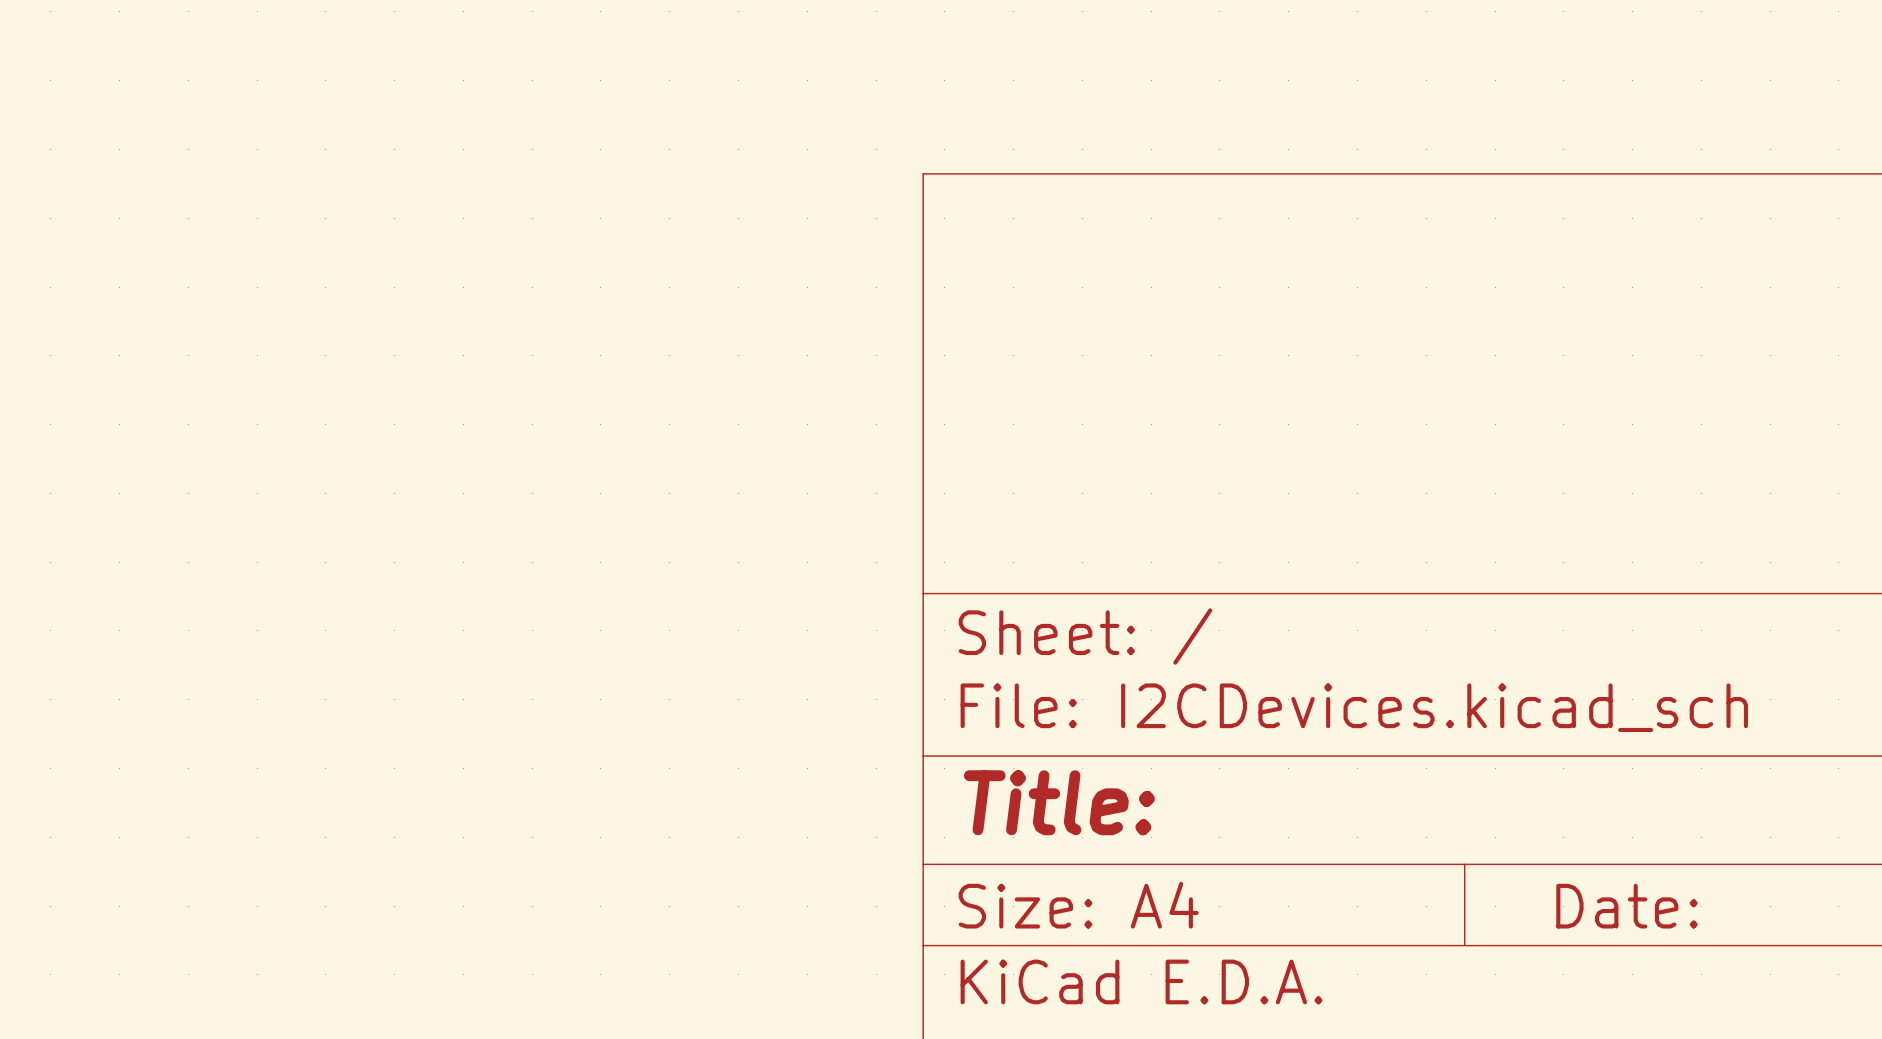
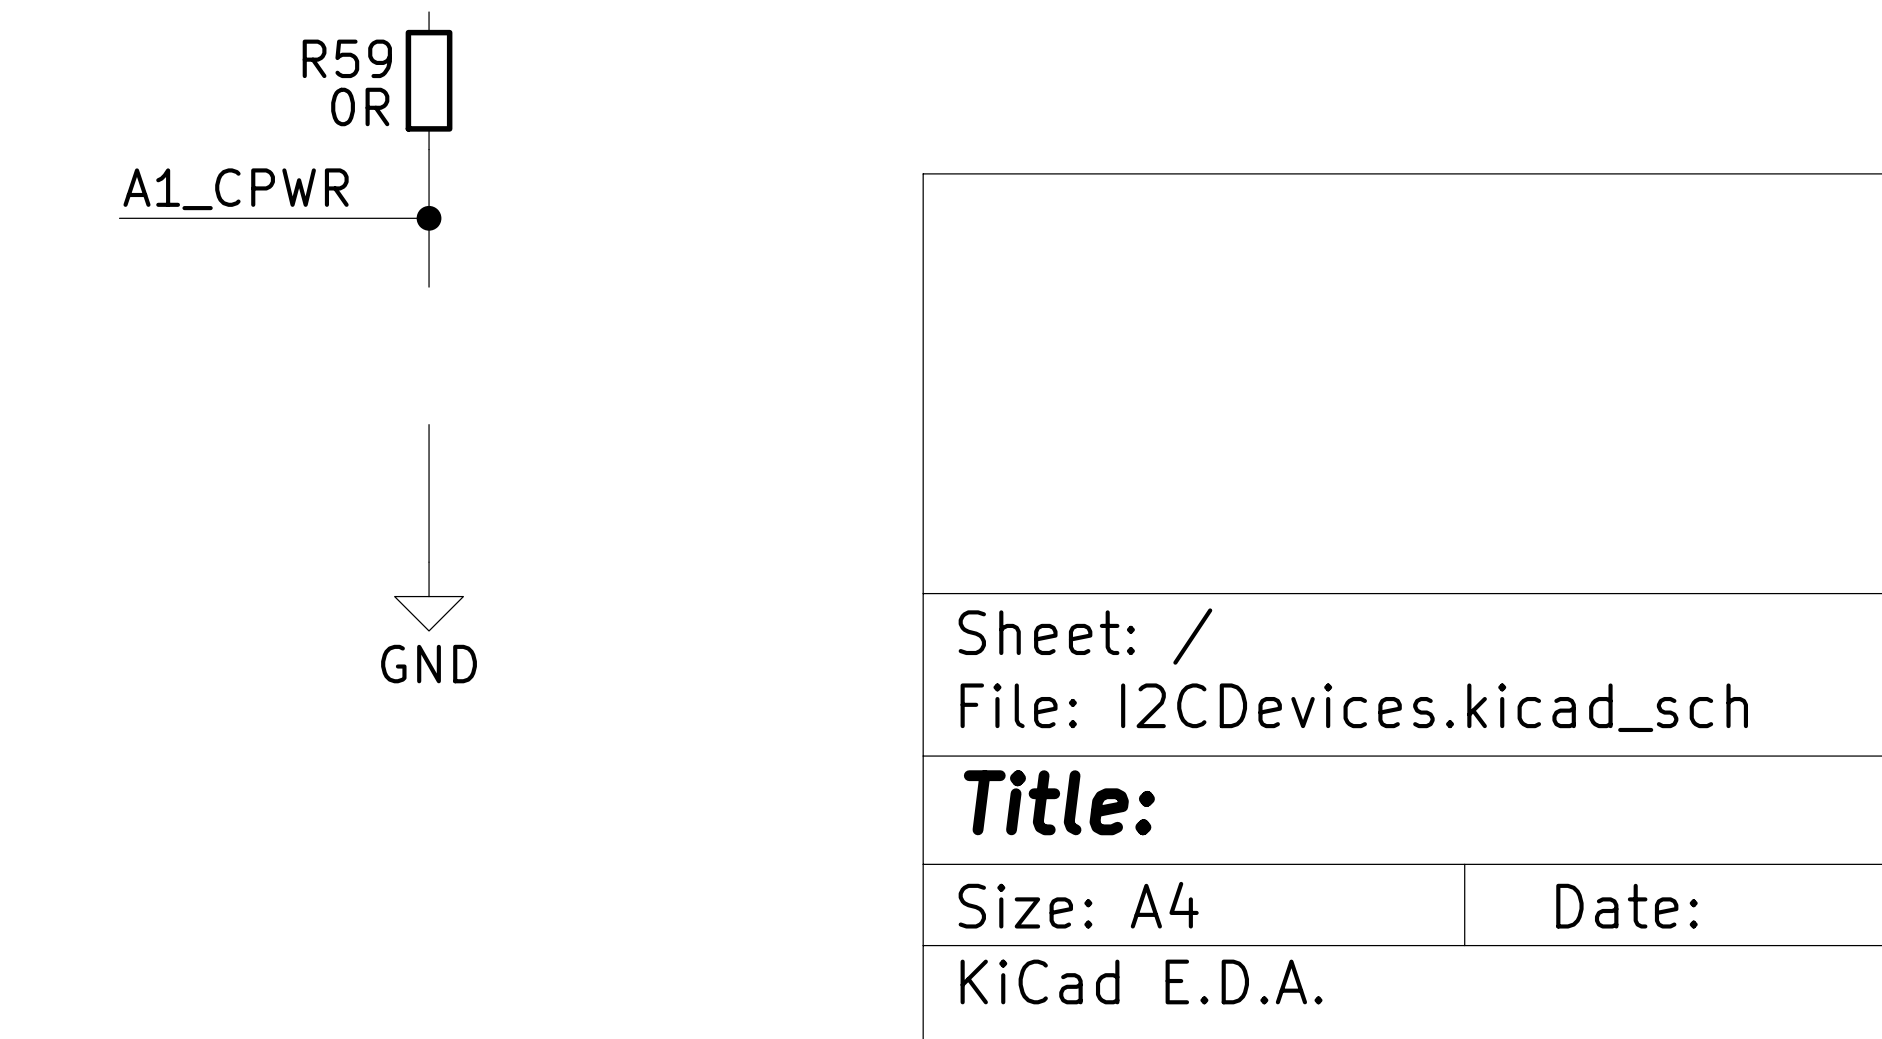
R59: none -> 0R (429, 80)
wire: none -> (429, 149) (429, 287)
label: none -> A1_CPWR (236, 189)
wire: none -> (119, 218) (429, 218)
junction: none -> (429, 218)
wire: none -> (429, 424) (429, 562)
power symbol: none -> GND (429, 596)

